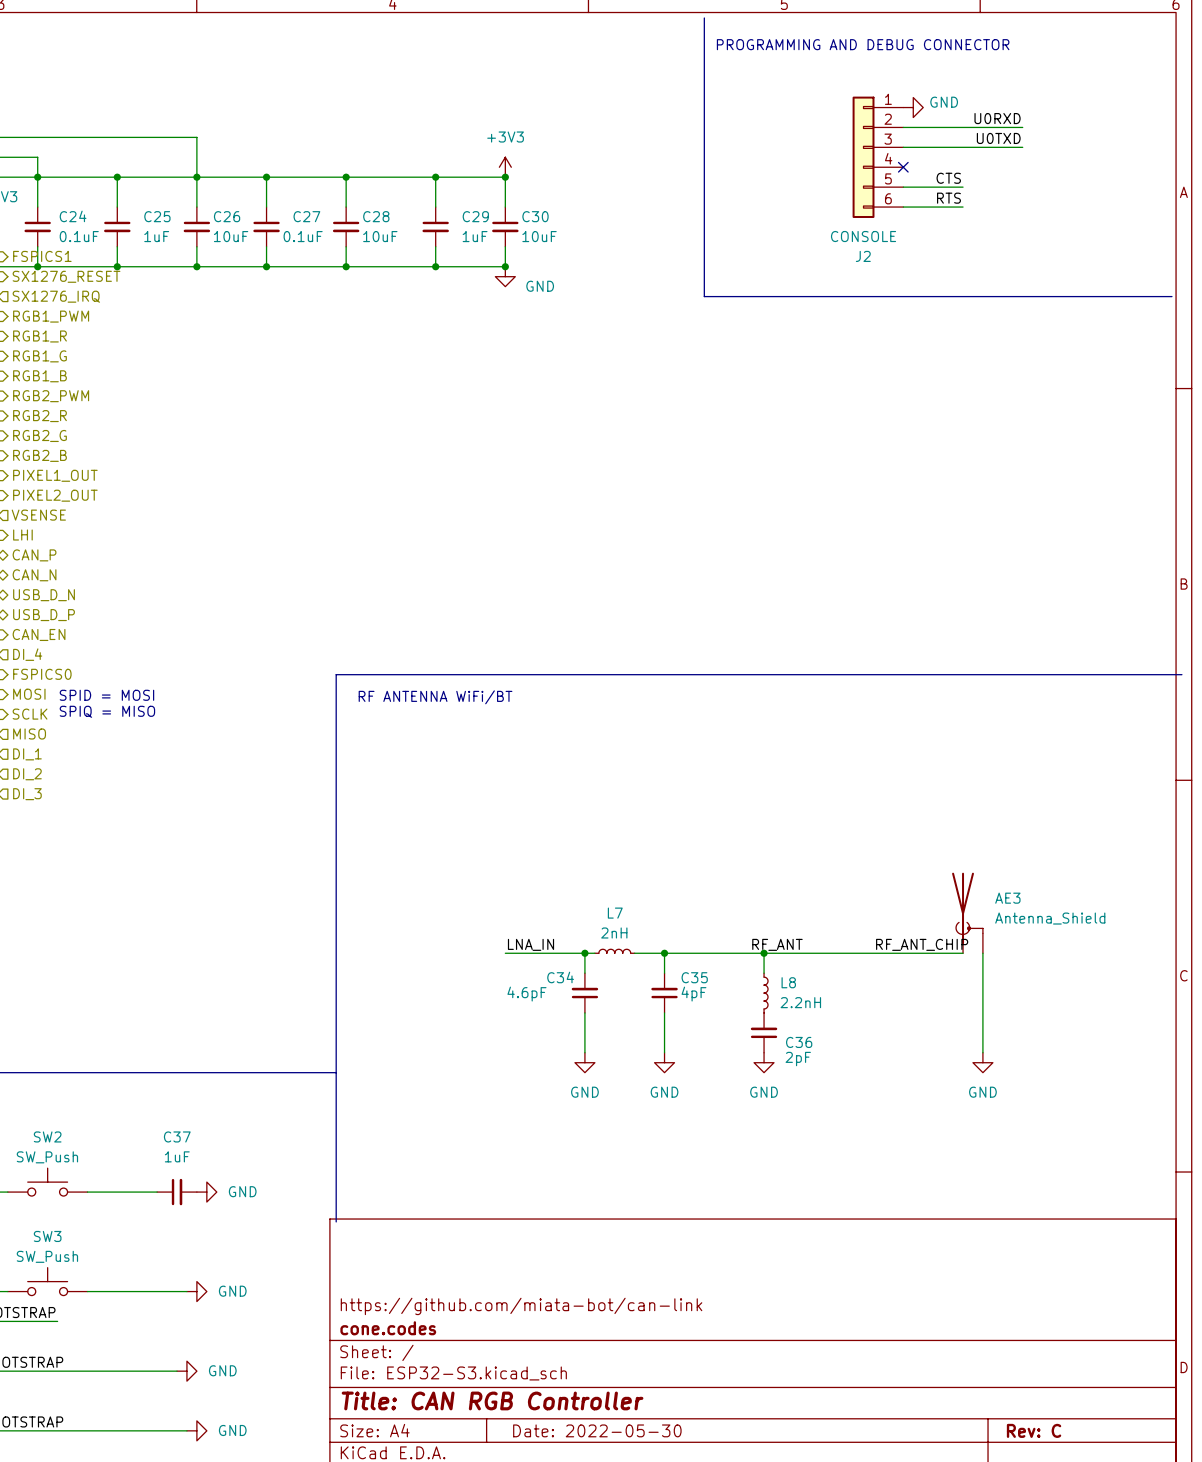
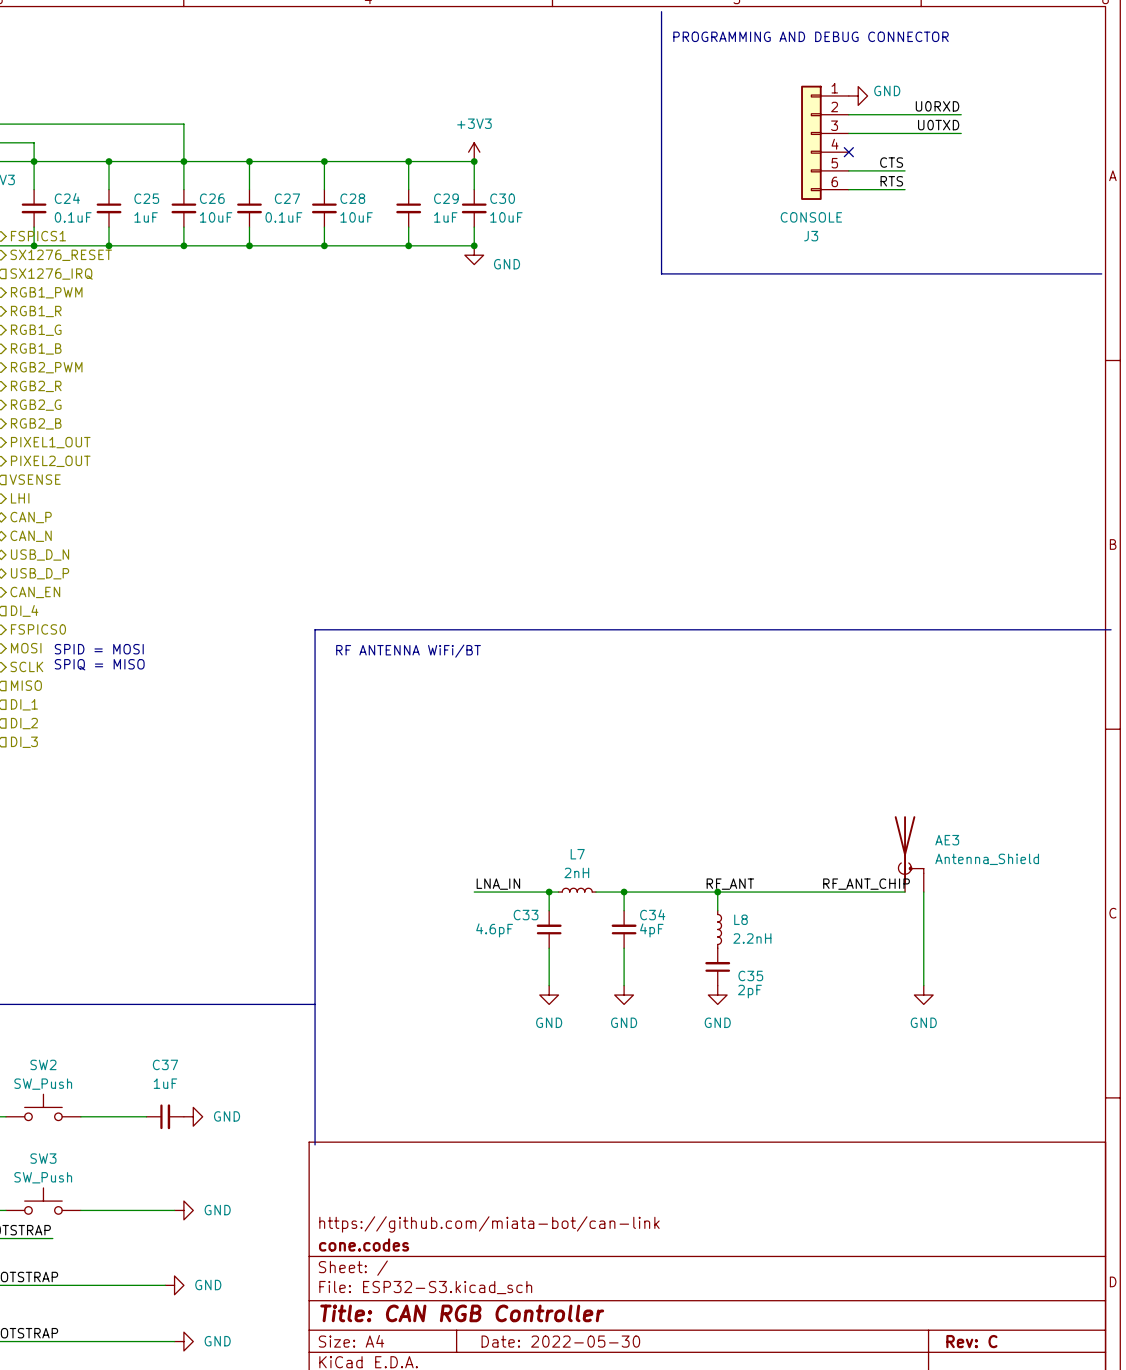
J2 name: J2 (863, 256) -> J3 (811, 236)
C34 name: C34 (560, 977) -> C33 (526, 915)
C35 name: C35 (694, 977) -> C34 (652, 914)
C36 name: C36 (799, 1042) -> C35 (750, 975)

